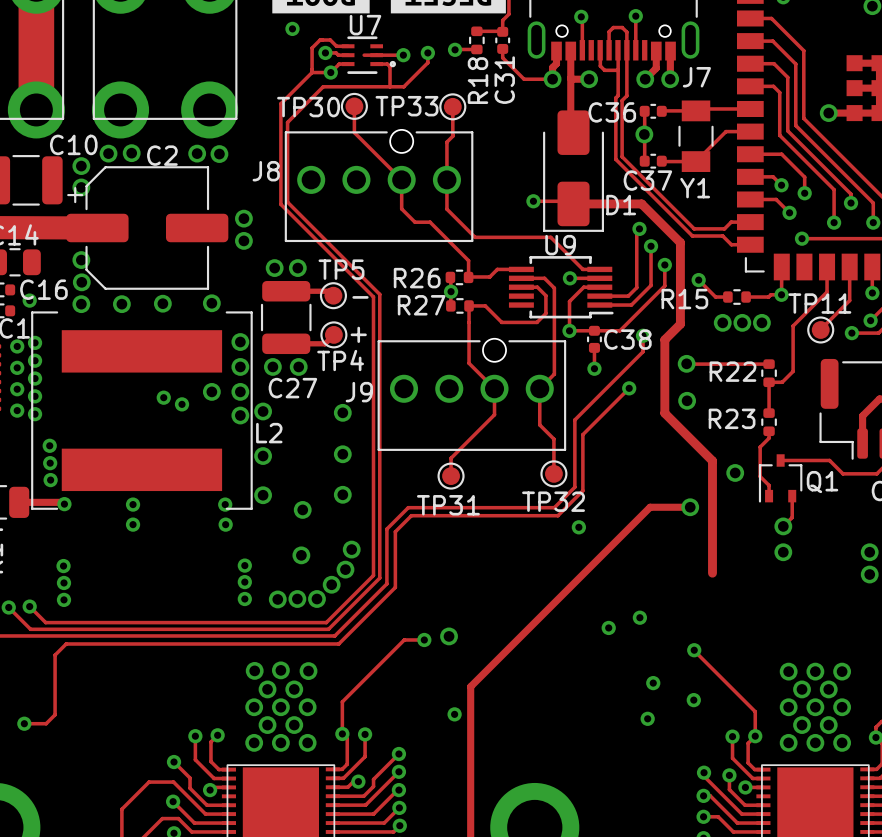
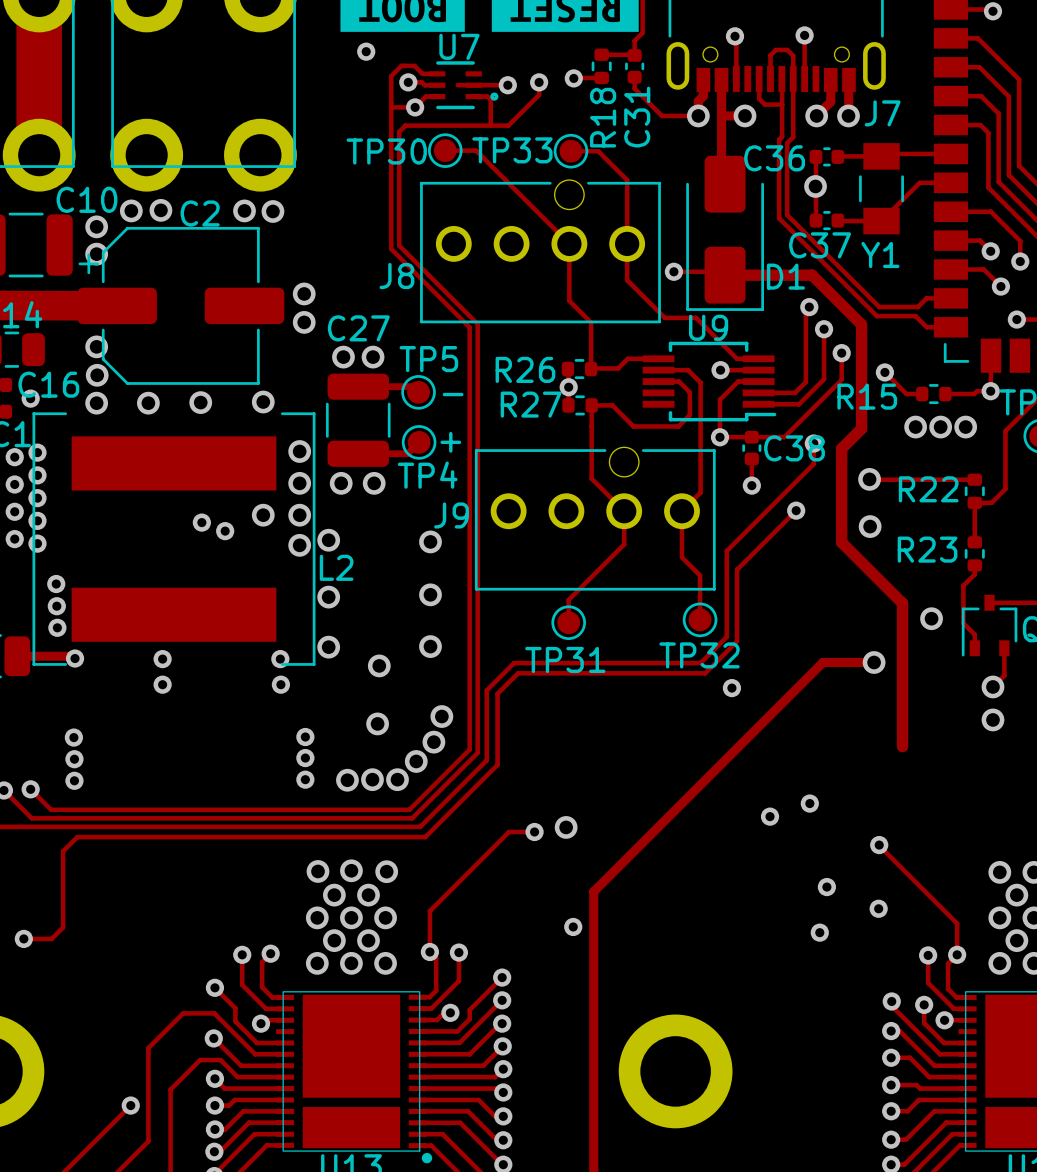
track: (312, 72) (280, 103) (280, 204) (373, 296) -> (391, 107) (391, 249) (469, 327) (469, 394)
track: (318, 91) (287, 122) (287, 202) (379, 294) -> (399, 131) (399, 245) (477, 324) (477, 390)
track: (354, 106) (354, 132) (401, 179) (401, 208) (414, 222) (430, 222) (468, 260) -> (445, 150) (476, 150) (569, 243) (569, 300) (591, 322) (591, 347)
track: (452, 106) (453, 135) (446, 142) (446, 209) (475, 237) (526, 237) -> (570, 151) (598, 151) (627, 180) (627, 280) (664, 317)
J8 name position: J8 (266, 171) -> J8 (396, 276)
J8 position: (379, 185) -> (540, 251)
C27 name position: C27 (292, 388) -> C27 (358, 328)

